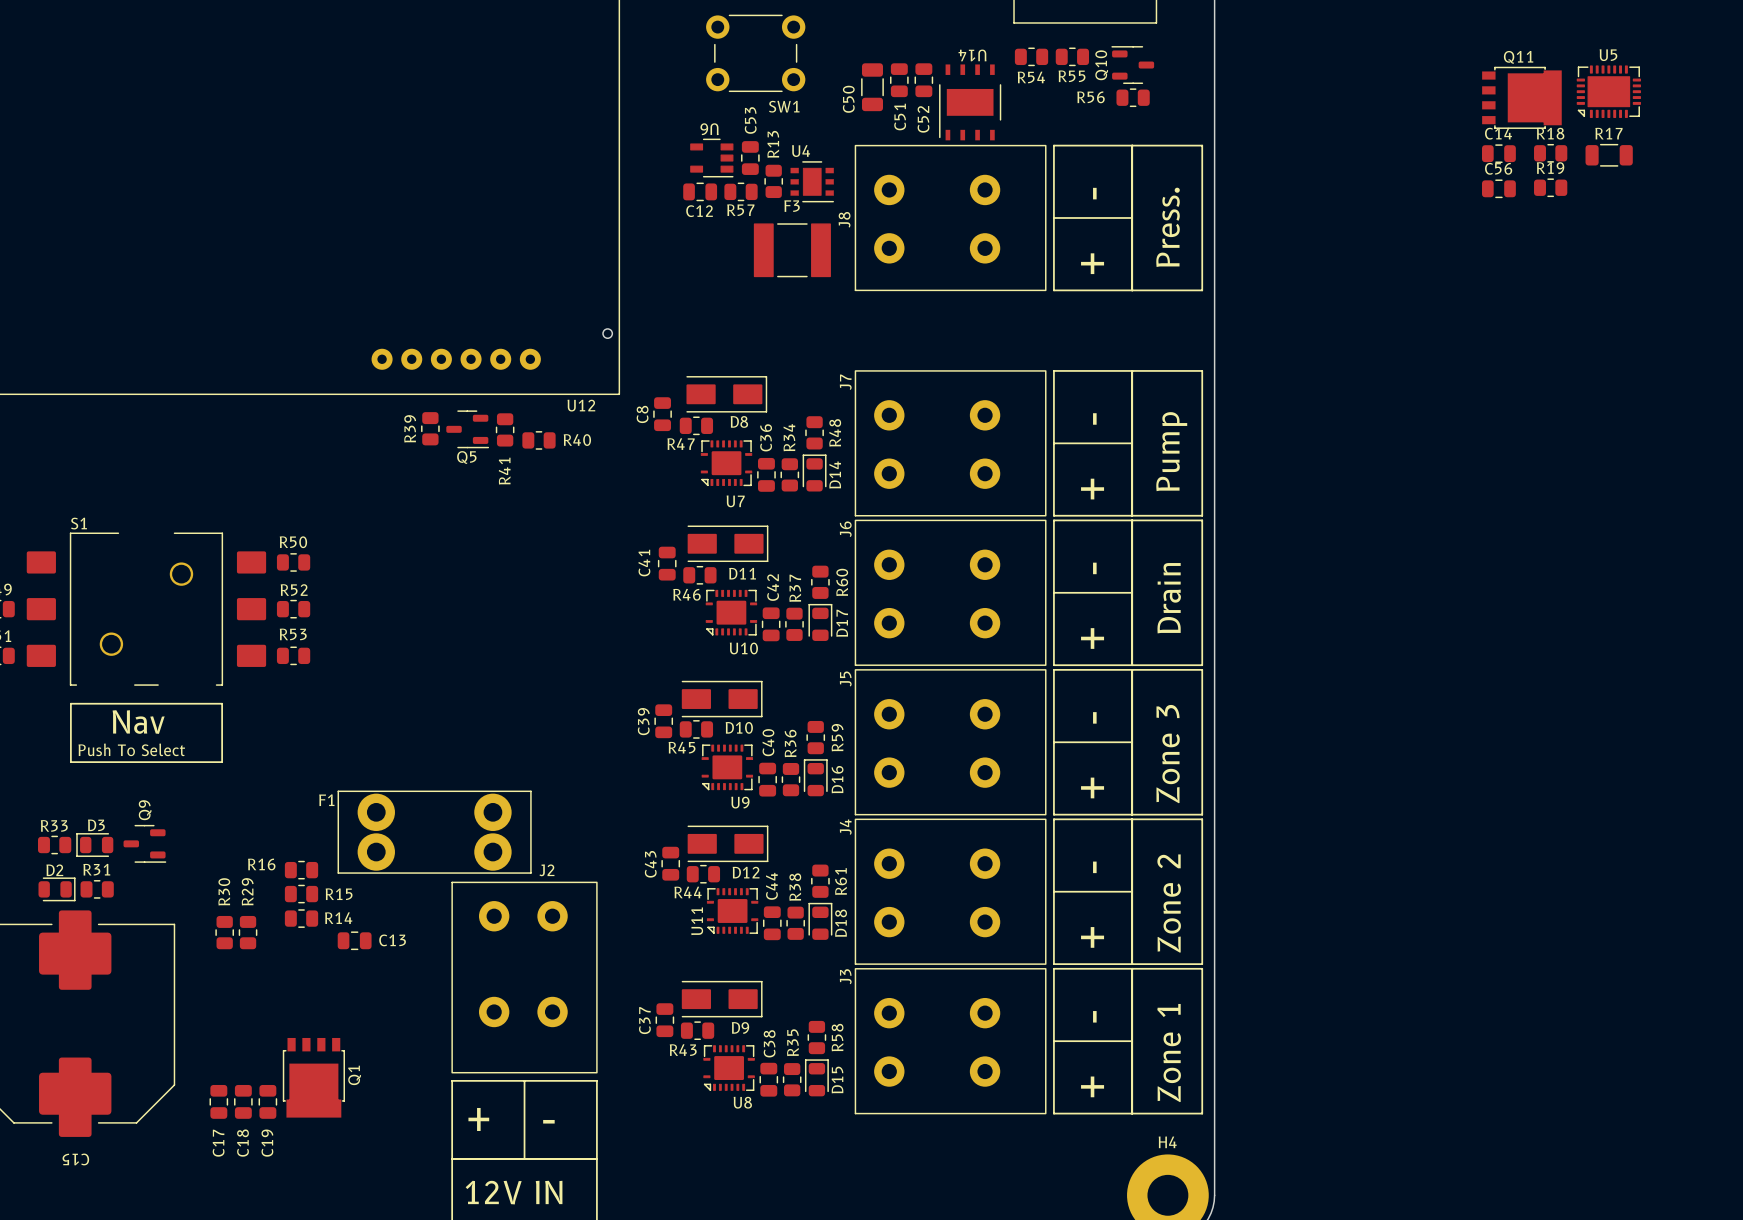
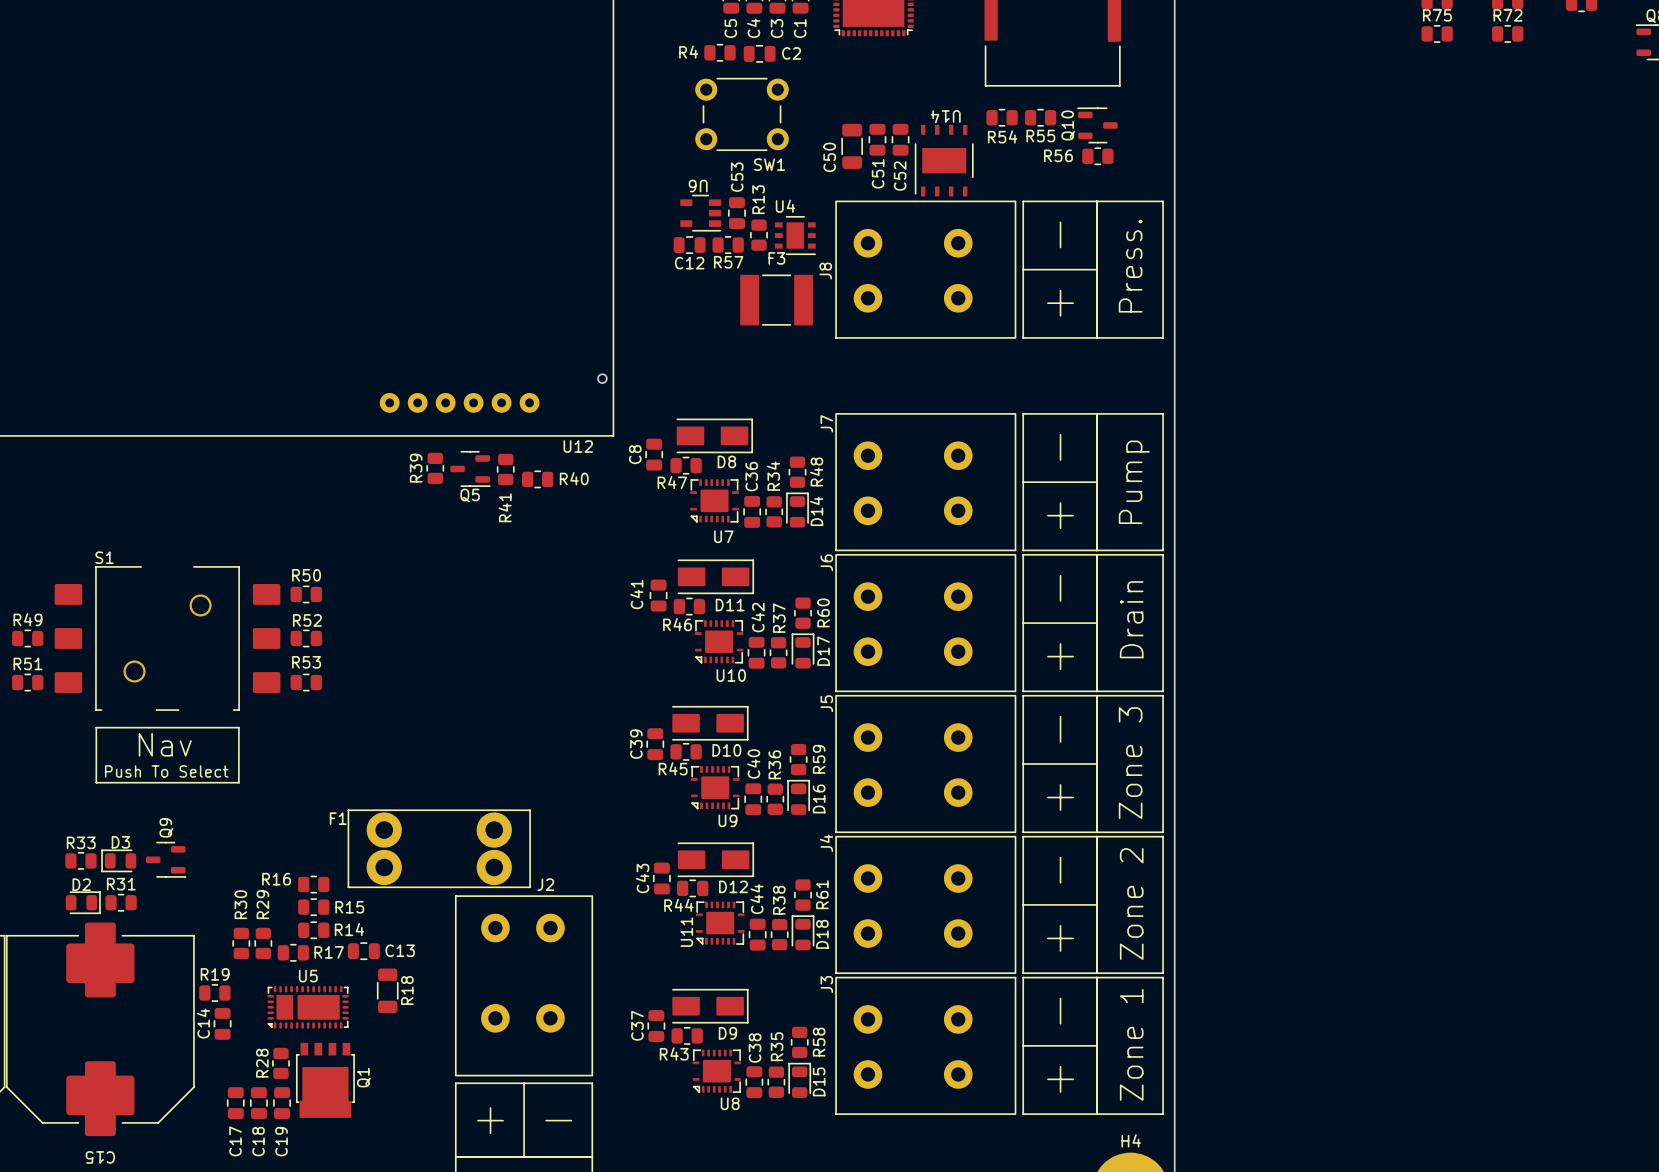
U5 footprint: [1576, 65, 1641, 118] -> [267, 985, 349, 1029]
Q11: (1521, 97) -> none
C14 name position: C14 (1498, 133) -> C14 (203, 1023)
R18 name position: R18 (1550, 133) -> R18 (407, 990)
R17 name position: R17 (1608, 133) -> R17 (329, 952)
R17 footprint: [1585, 143, 1633, 167] -> [277, 944, 310, 962]
R18 footprint: [1534, 144, 1568, 163] -> [377, 968, 399, 1014]
C14 rotation: 0° (1498, 153) -> 90° clockwise (222, 1023)
C14 position: (1498, 153) -> (222, 1023)
R19 position: (1550, 187) -> (214, 993)
C56: (1498, 188) -> none
R28: none -> (280, 1063)

